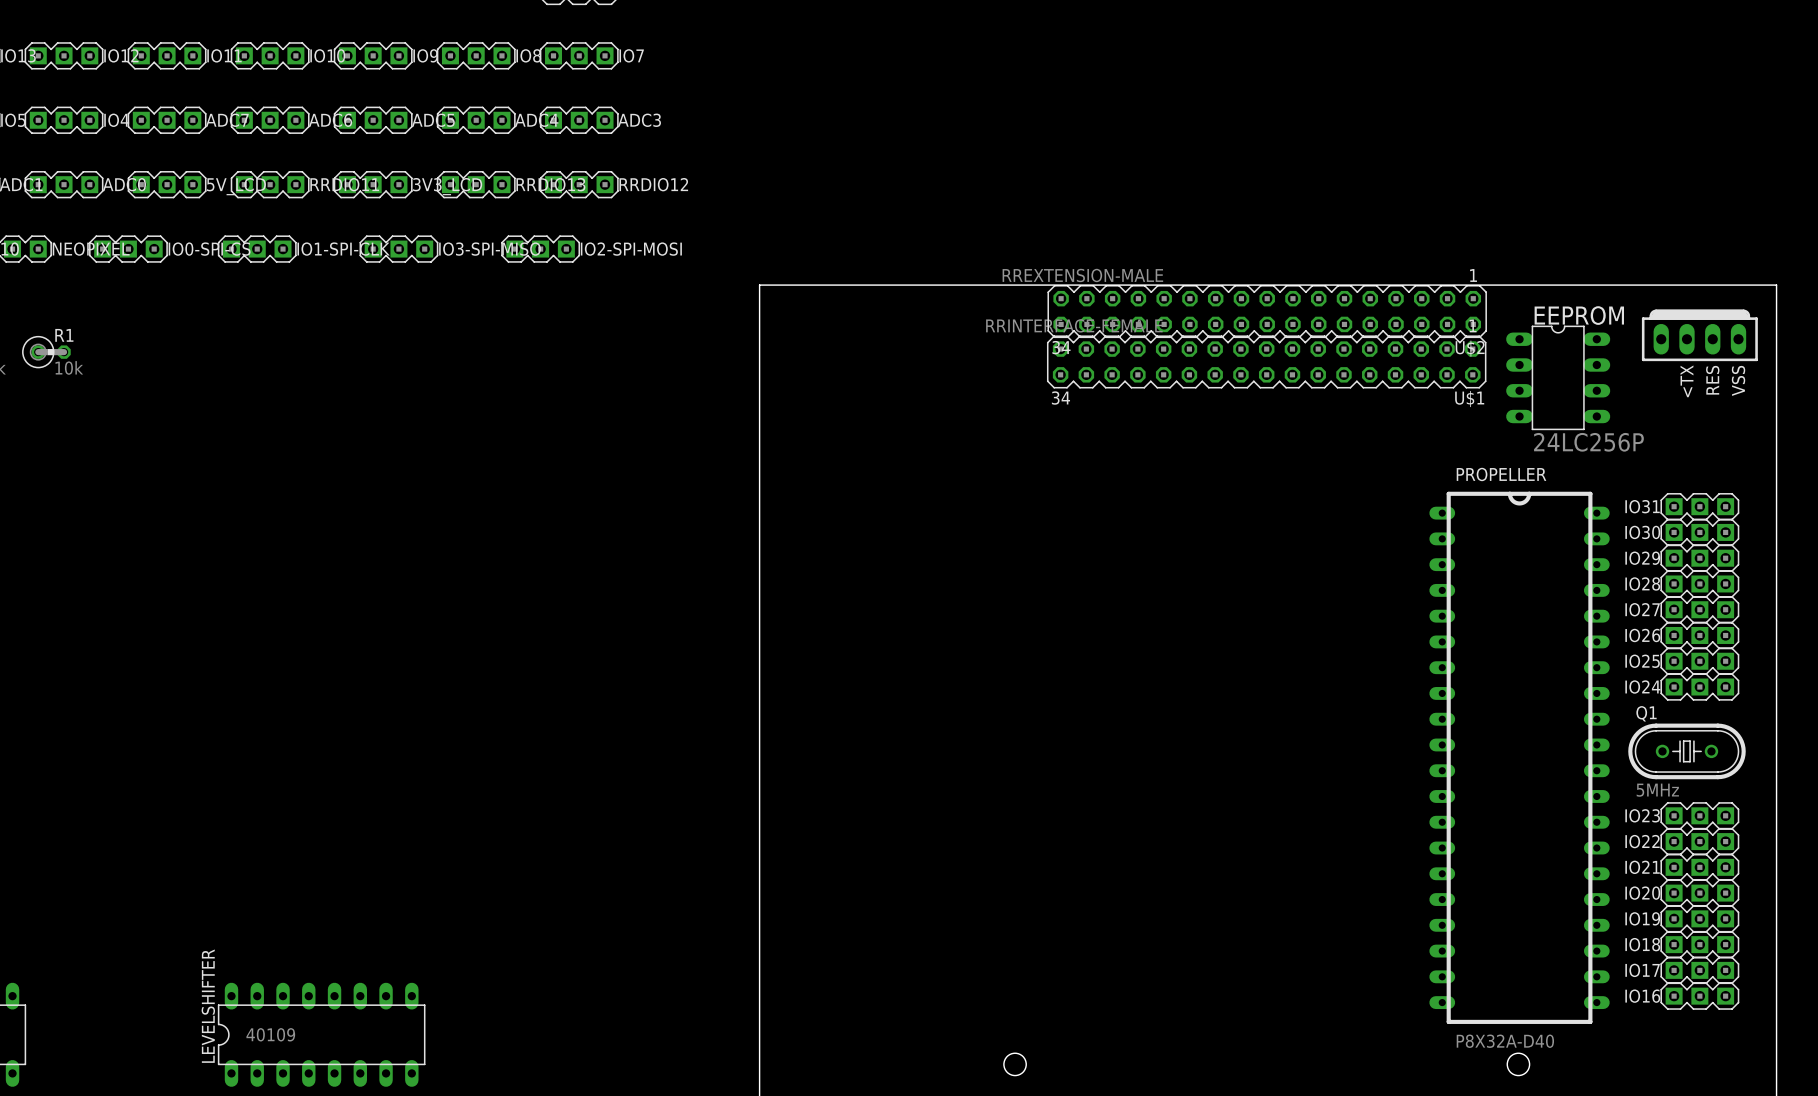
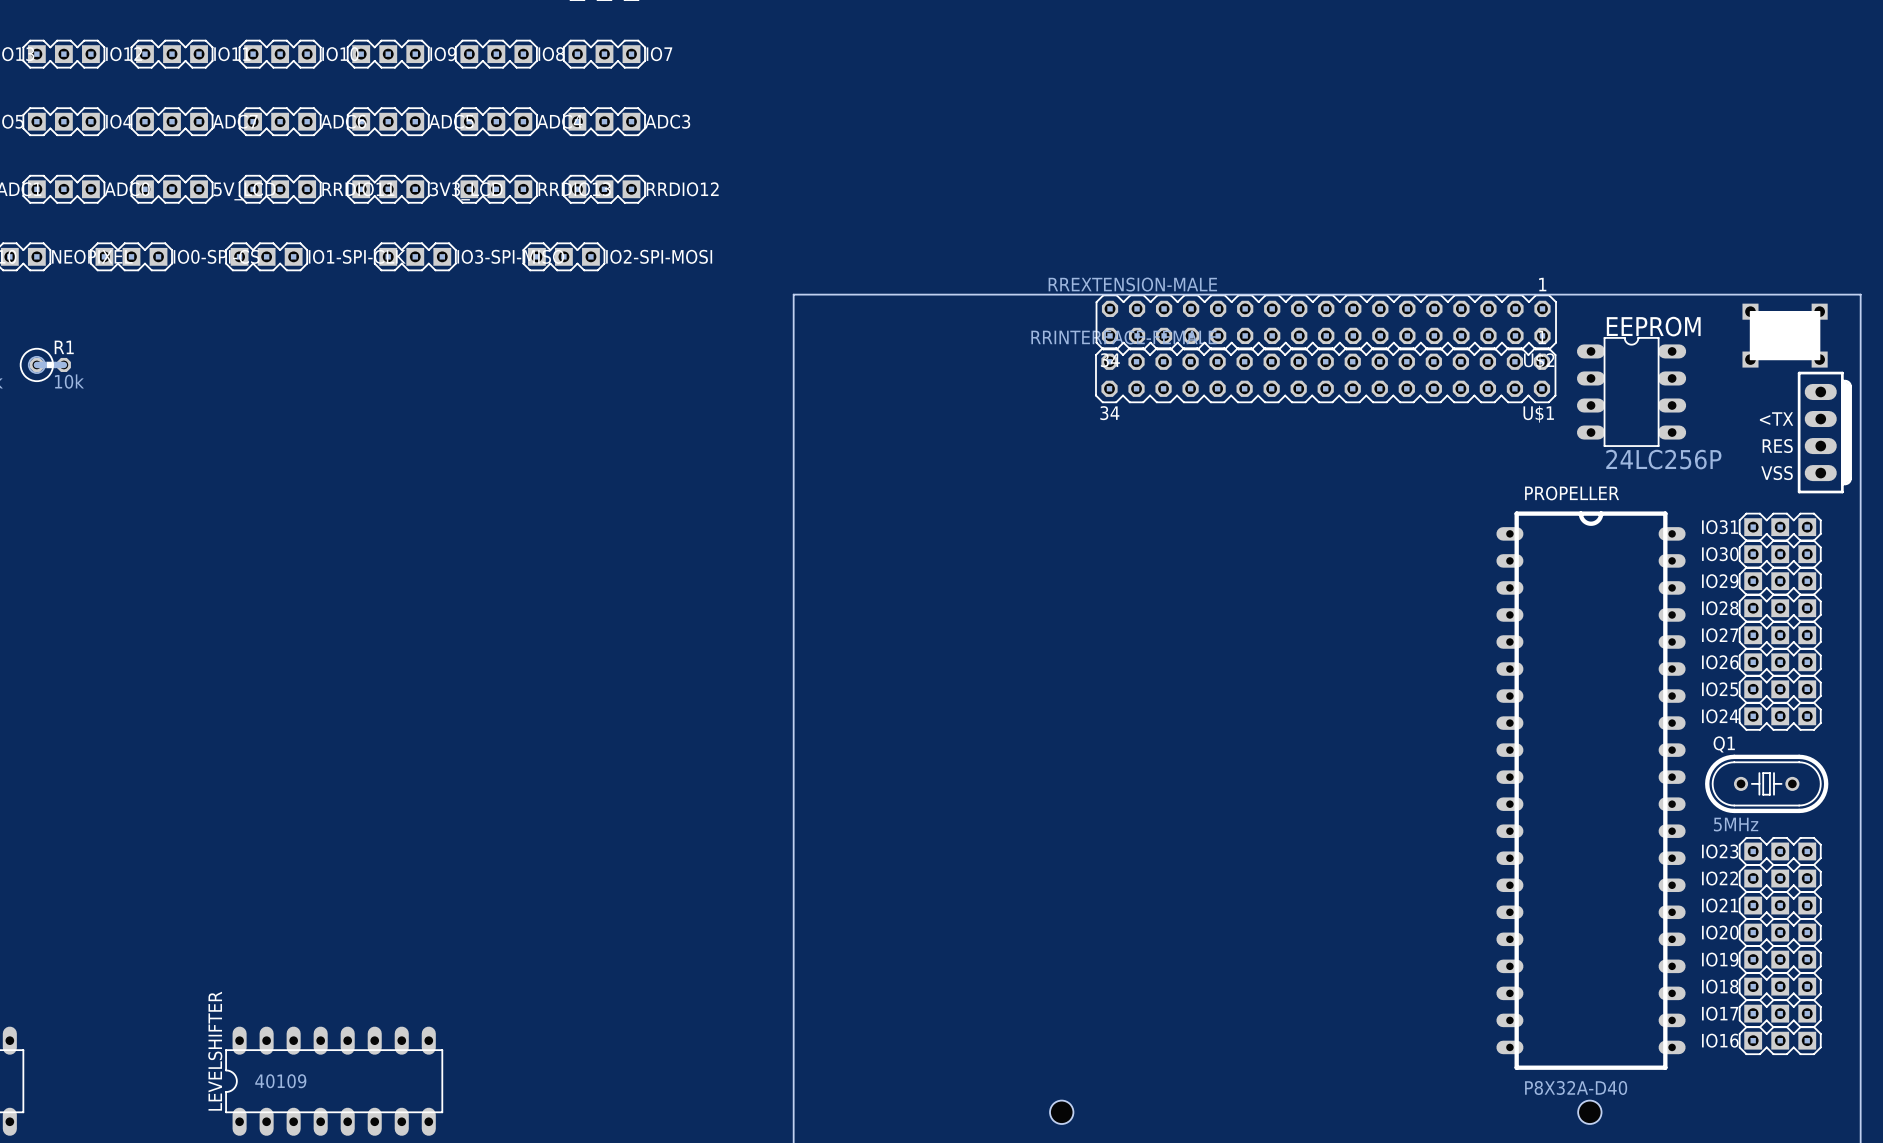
part: none -> (1785, 335)
part rotation: 0° (1699, 335) -> 90° clockwise (1824, 432)
part position: (1699, 335) -> (1824, 432)

